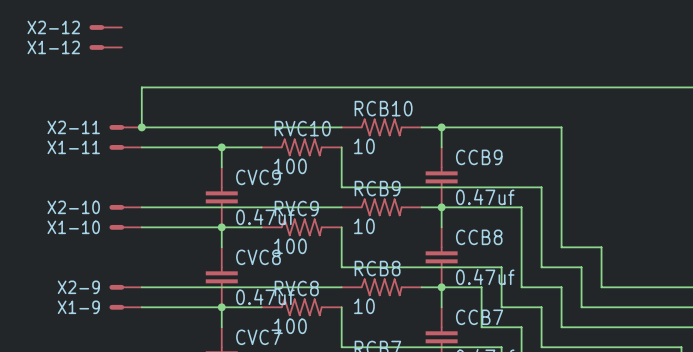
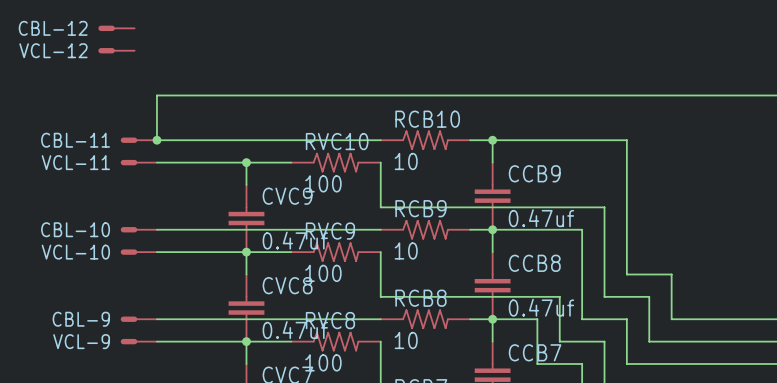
X2-12 name: X2-12 (53, 27) -> CBL-12 (53, 28)
X1-12 name: X1-12 (53, 47) -> VCL-12 (53, 50)
X2-11 name: X2-11 (73, 127) -> CBL-11 (75, 140)
X1-11 name: X1-11 (73, 147) -> VCL-11 (75, 162)
X2-10 name: X2-10 (73, 207) -> CBL-10 (75, 229)
X1-10 name: X1-10 (73, 227) -> VCL-10 (75, 252)
X2-9 name: X2-9 (78, 287) -> CBL-9 (81, 319)
X1-9 name: X1-9 (78, 307) -> VCL-9 (81, 341)

